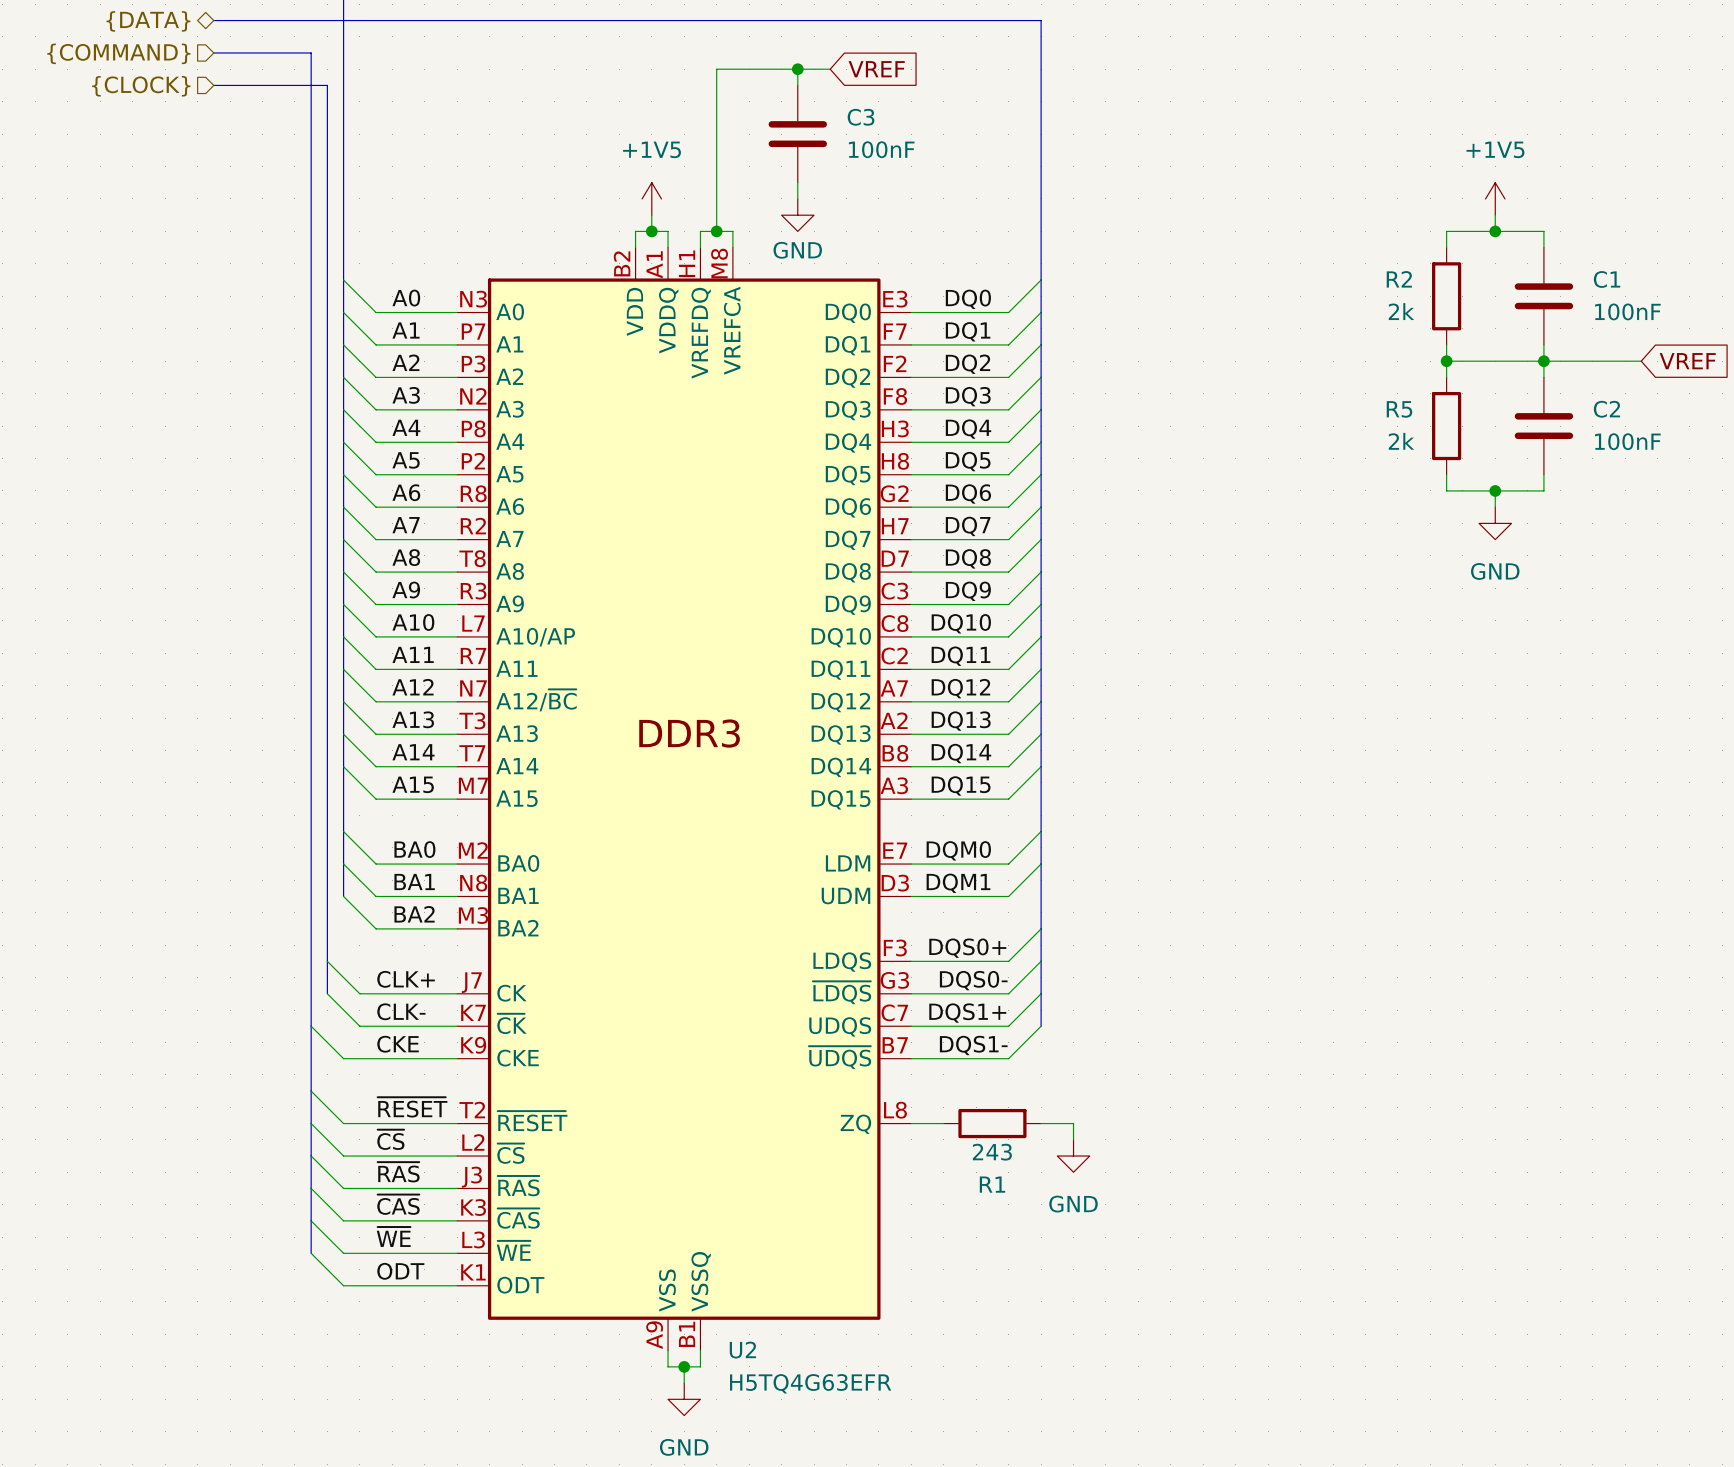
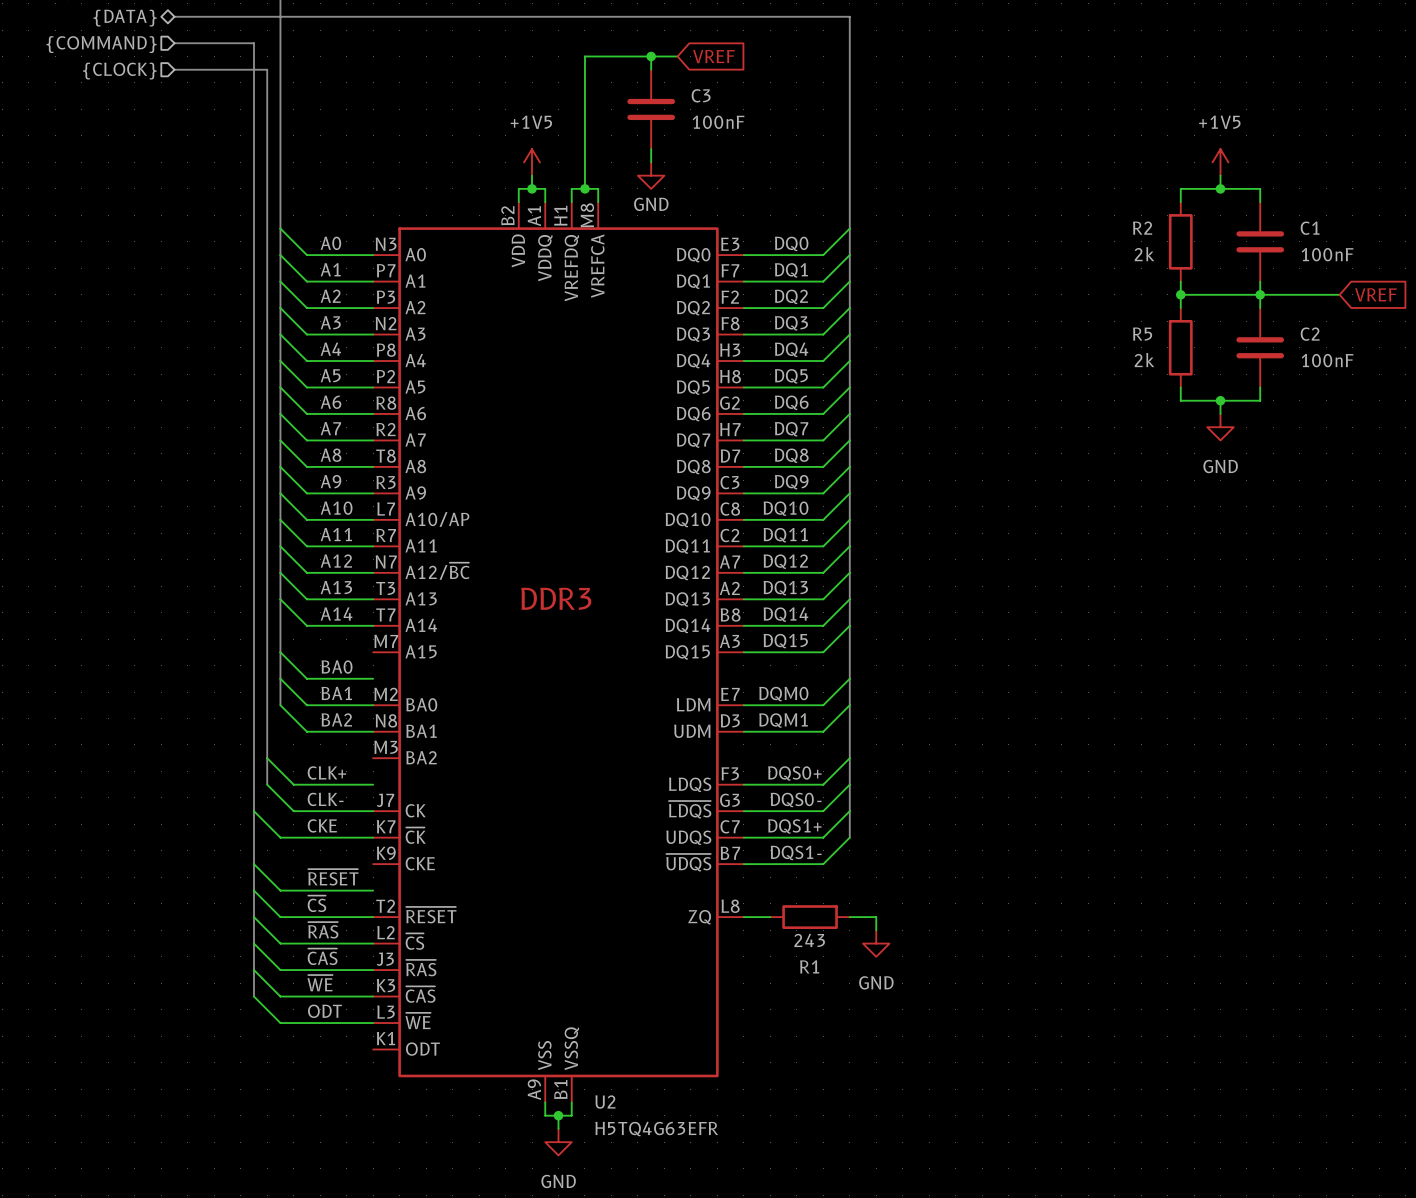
wire: (343, 766) (376, 799) (457, 799) -> (280, 652) (306, 678) (373, 678)
label: A15 (413, 784) -> none
label: none -> BA0 (337, 667)
label: BA0 (414, 849) -> BA1 (336, 693)
bus: (343, 864) (343, 896) -> none
label: BA1 (414, 882) -> BA2 (336, 719)
wire: (343, 896) (376, 928) (457, 928) -> none
label: BA2 (414, 914) -> none
wire: none -> (267, 758) (293, 784) (373, 784)
label: none -> CLK+ (326, 772)
bus: (327, 961) (327, 993) -> none
label: CLK+ (406, 979) -> CLK- (325, 799)
wire: (327, 993) (359, 1026) -> (253, 811) (280, 837) (293, 837)
label: CLK- (401, 1011) -> CKE (322, 825)
wire: (311, 1026) (343, 1058) (457, 1058) -> (253, 864) (280, 890) (373, 890)
label: CKE (398, 1044) -> none
label: none -> ~{RESET} (333, 877)
label: ~{RESET} (412, 1107) -> ~{CS} (316, 903)
label: ~{CS} (390, 1139) -> ~{RAS} (323, 930)
label: ~{RAS} (398, 1172) -> ~{CAS} (322, 956)
label: ~{CAS} (398, 1204) -> ~{WE} (320, 983)
bus: (311, 1220) (311, 1253) -> none
label: ~{WE} (393, 1236) -> ODT (324, 1011)
wire: (311, 1253) (343, 1285) (457, 1285) -> none
label: ODT (400, 1271) -> none

